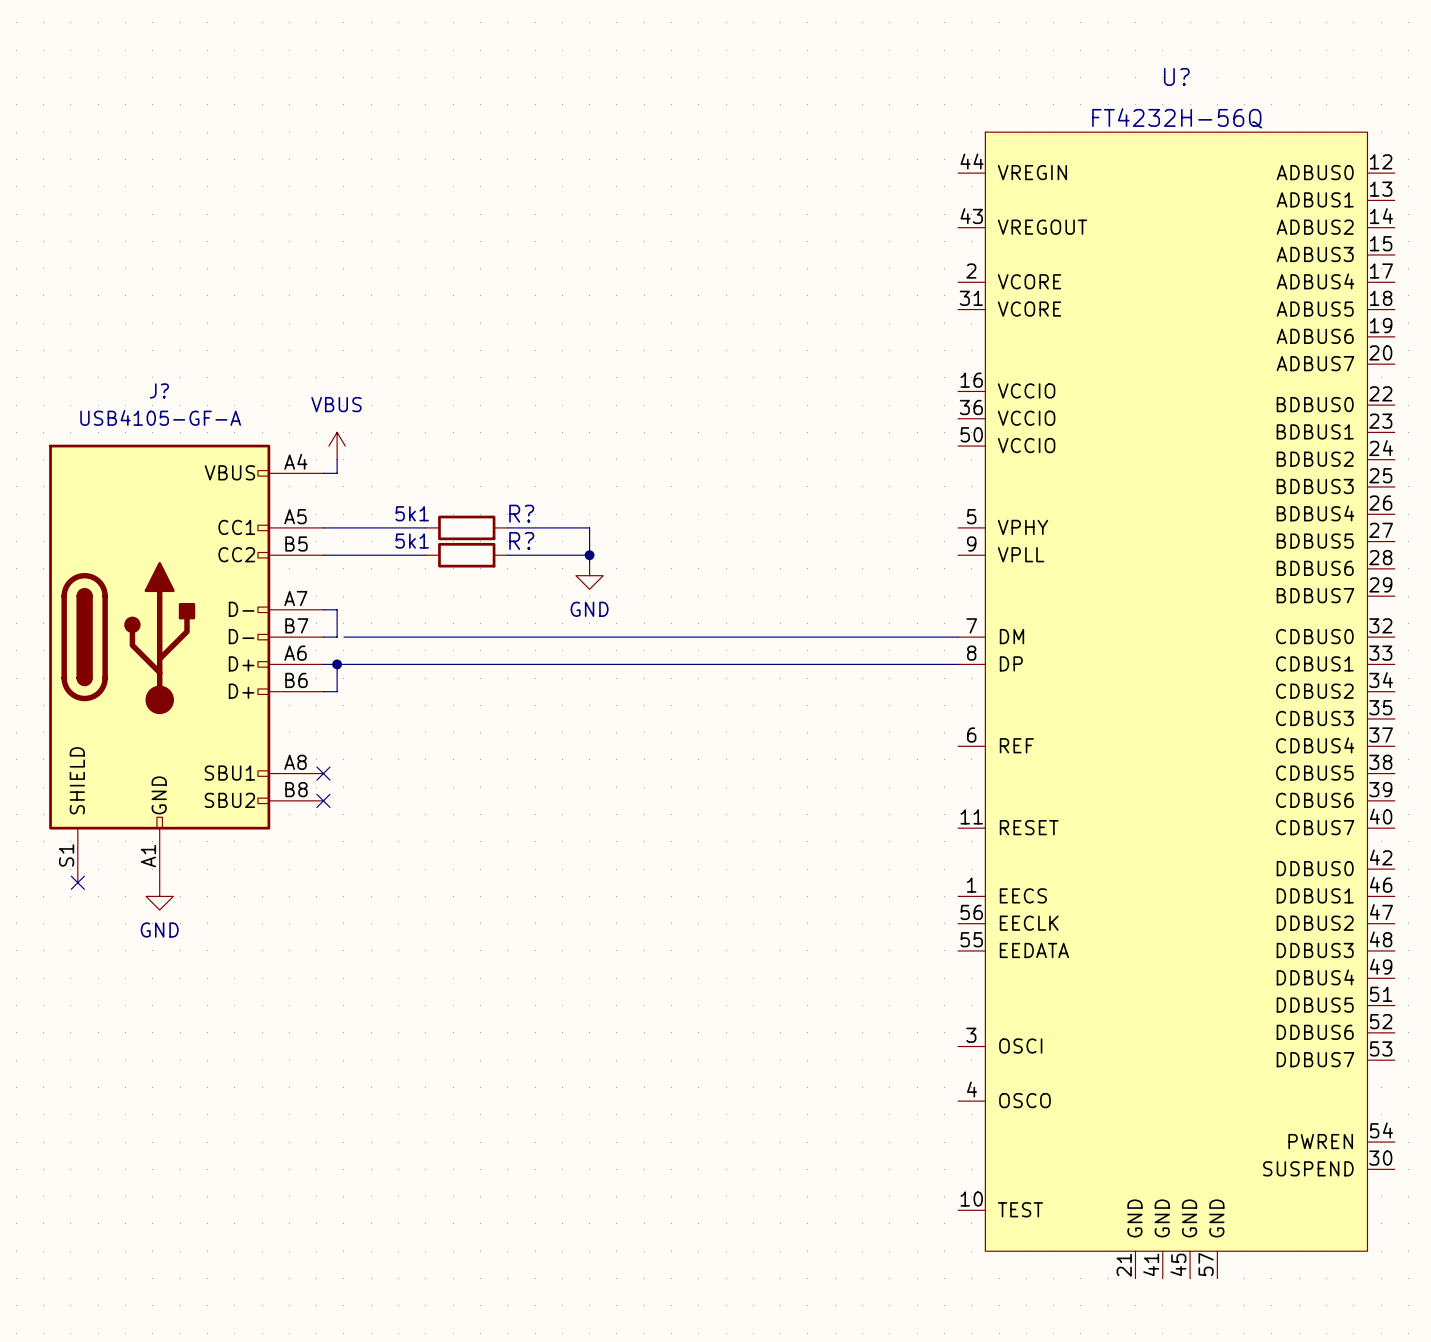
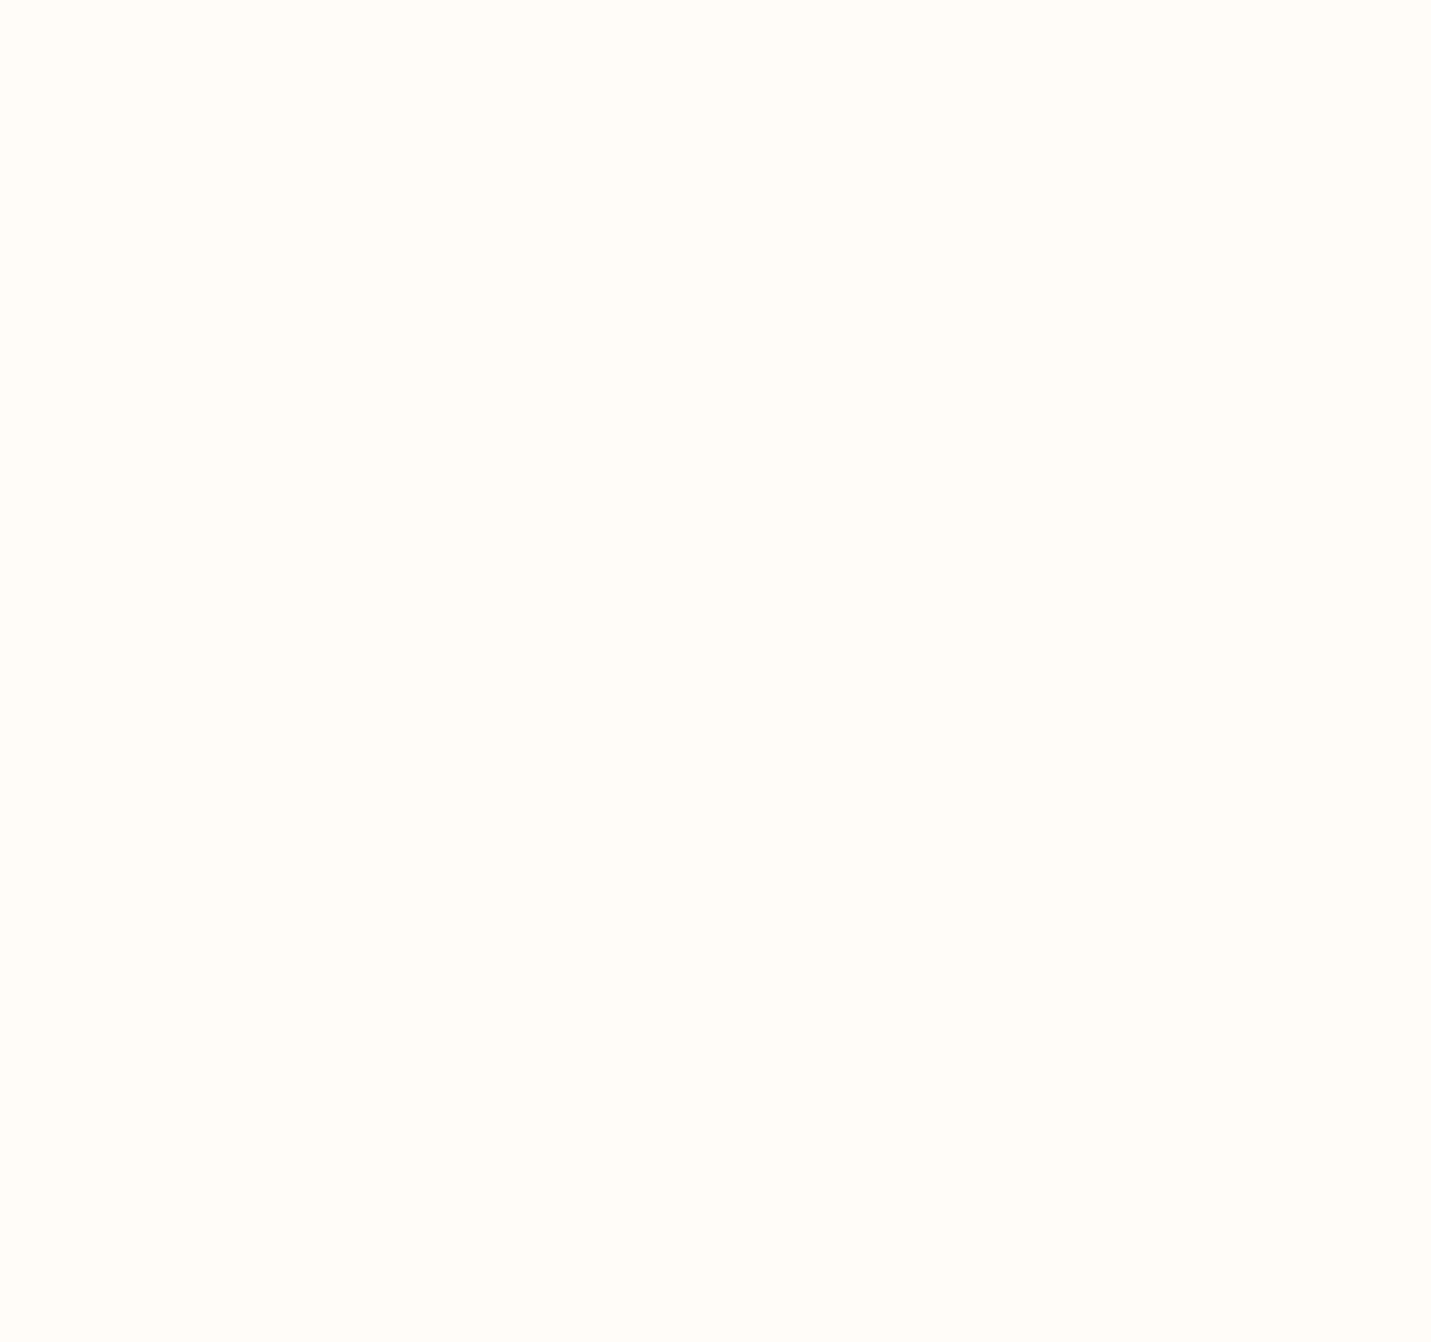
power symbol: VBUS (337, 446) -> none
wire: (337, 459) (337, 473) (323, 473) -> none
wire: (323, 527) (425, 527) -> none
R?: (466, 527) -> none
wire: (507, 527) (589, 527) (589, 562) -> none
wire: (323, 555) (425, 555) -> none
R?: (466, 555) -> none
wire: (507, 555) (589, 555) -> none
junction: (589, 555) -> none
power symbol: GND (589, 575) -> none
wire: (323, 609) (337, 609) (337, 637) (323, 637) -> none
wire: (343, 637) (958, 637) -> none
J?: USB4105-GF-A (186, 663) -> none
wire: (323, 664) (958, 664) -> none
wire: (337, 664) (337, 691) (323, 691) -> none
junction: (337, 664) -> none
U?: FT4232H-56Q (1176, 705) -> none
no-connect mark: (323, 773) -> none
no-connect mark: (323, 800) -> none
no-connect mark: (77, 882) -> none
power symbol: GND (159, 896) -> none

